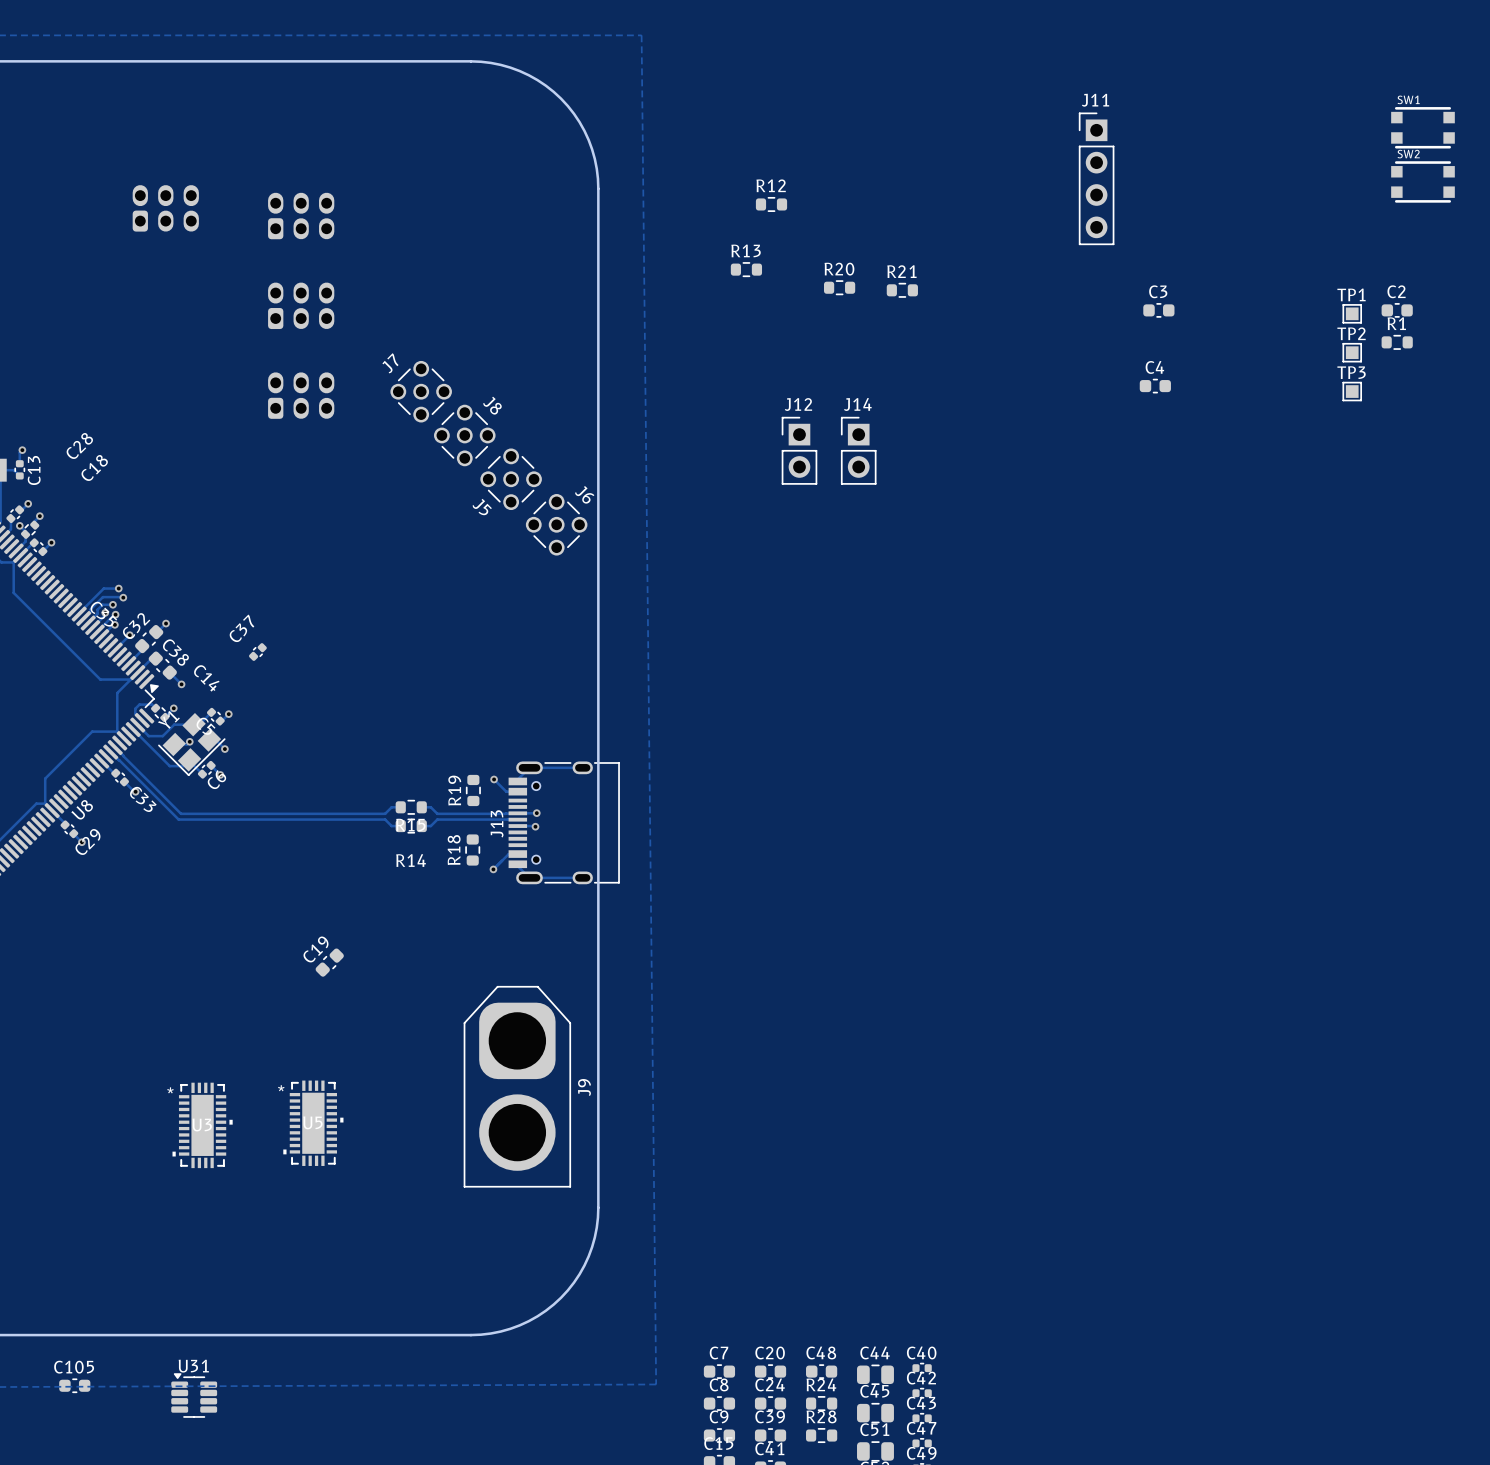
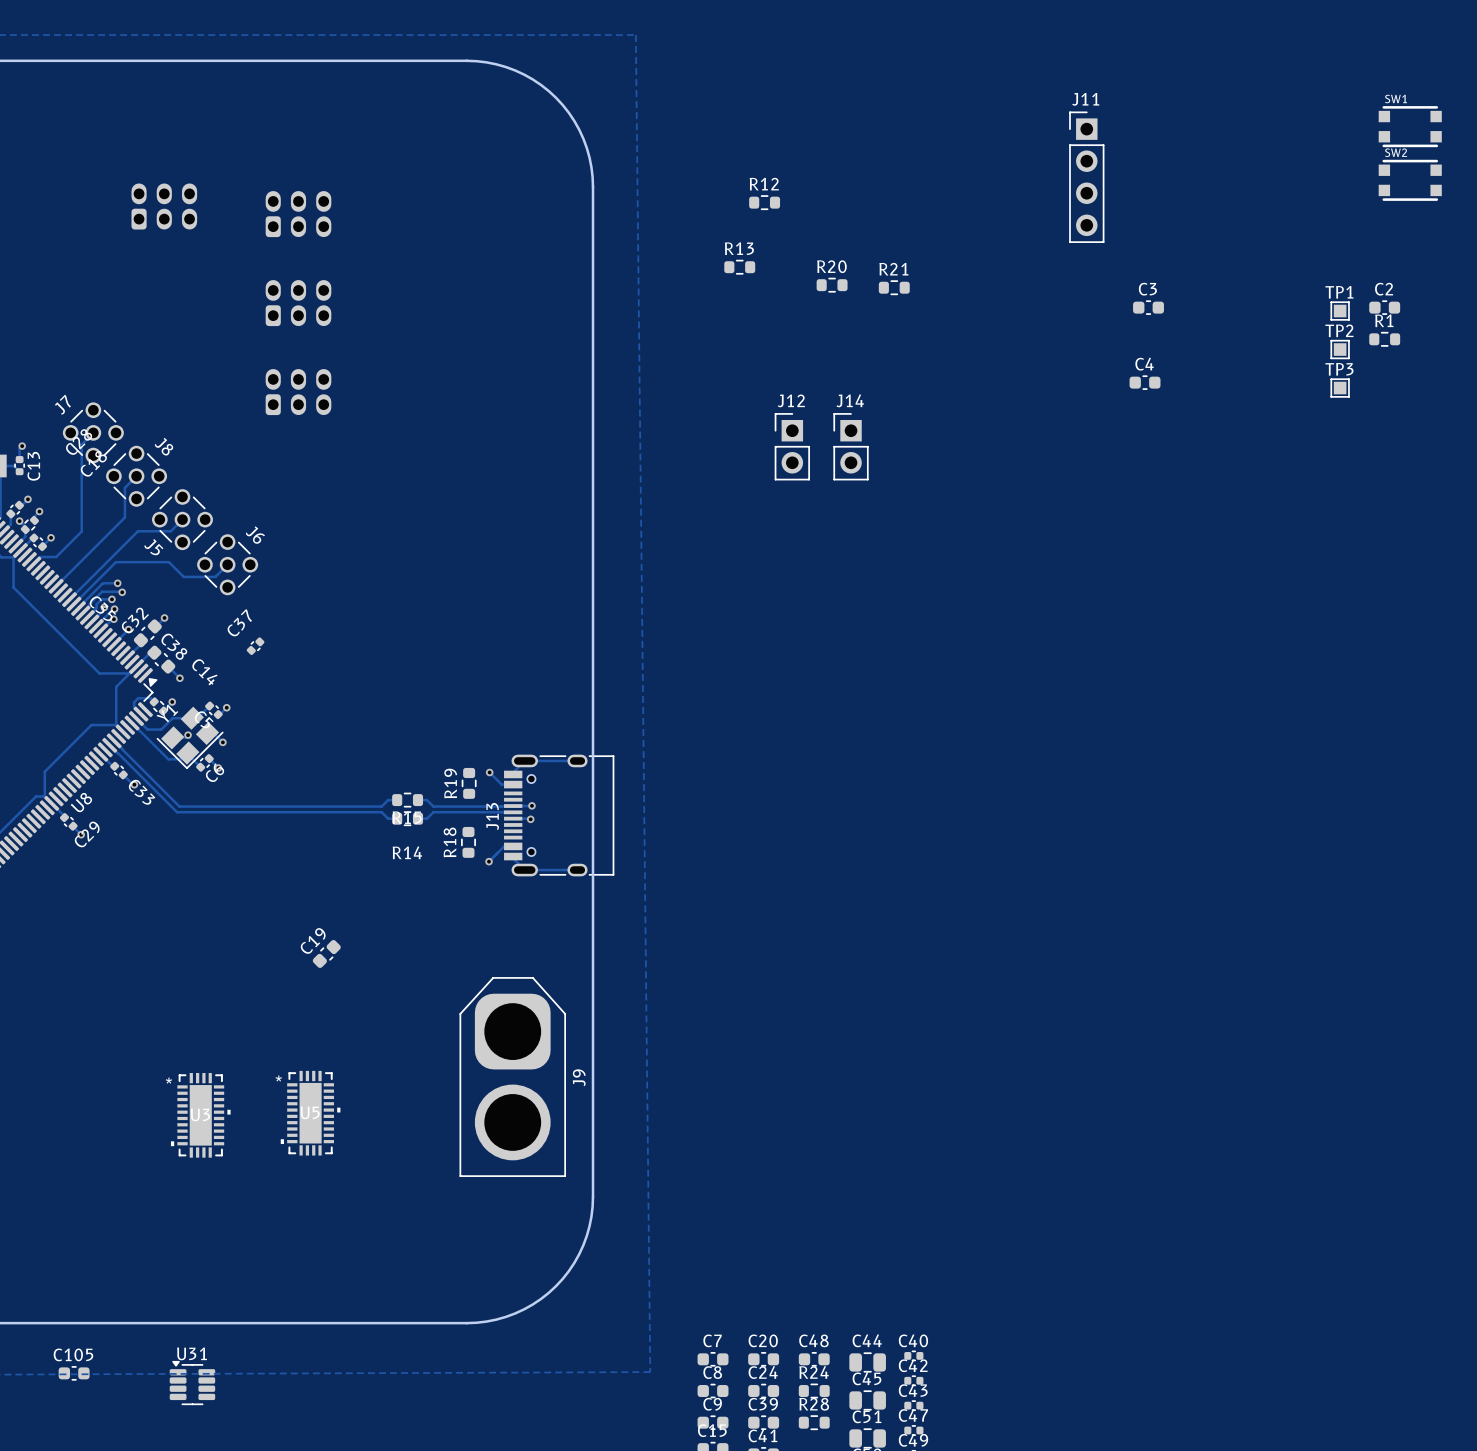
J7 position: (421, 391) -> (93, 432)
J8 position: (464, 435) -> (136, 476)
track: none -> (93, 432) (81, 444) (81, 531) (56, 557) (40, 557) (33, 563)
J5 position: (511, 479) -> (182, 519)
track: none -> (136, 476) (124, 487) (124, 517) (56, 586)
track: none -> (182, 519) (170, 531) (137, 531) (69, 599)
J6 position: (556, 524) -> (227, 564)
track: none -> (227, 564) (215, 576) (183, 576) (169, 562) (115, 562) (74, 604)

